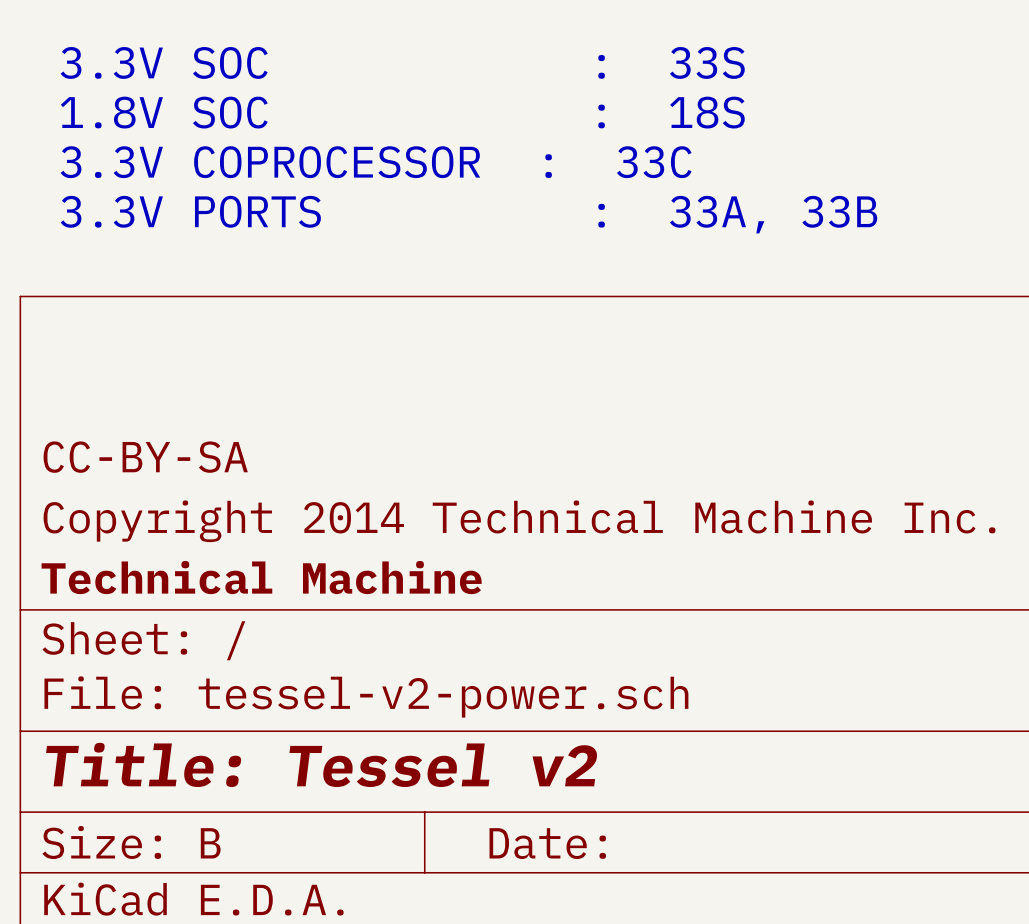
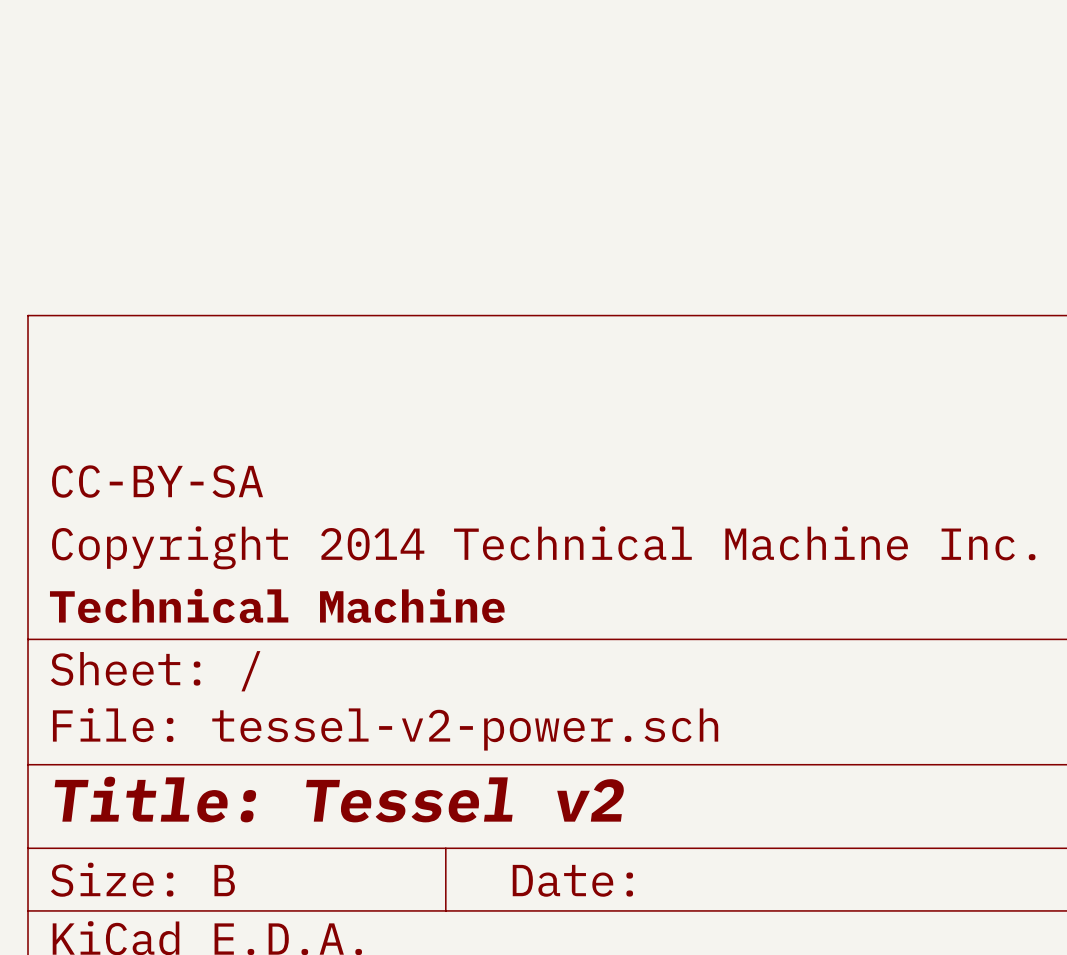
text: 3.3V SOC : 33S (402, 62) -> none
text: 1.8V SOC : 18S (402, 112) -> none
text: 3.3V COPROCESSOR : 33C (376, 162) -> none
text: 3.3V PORTS : 33A, 33B (468, 214) -> none

